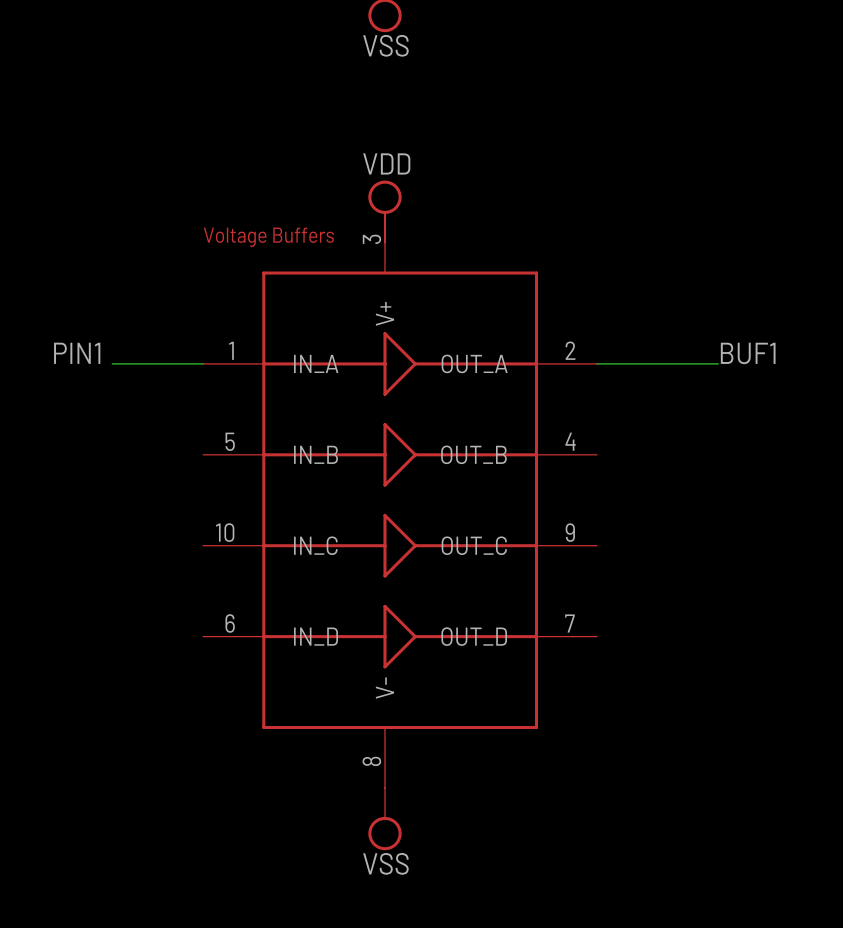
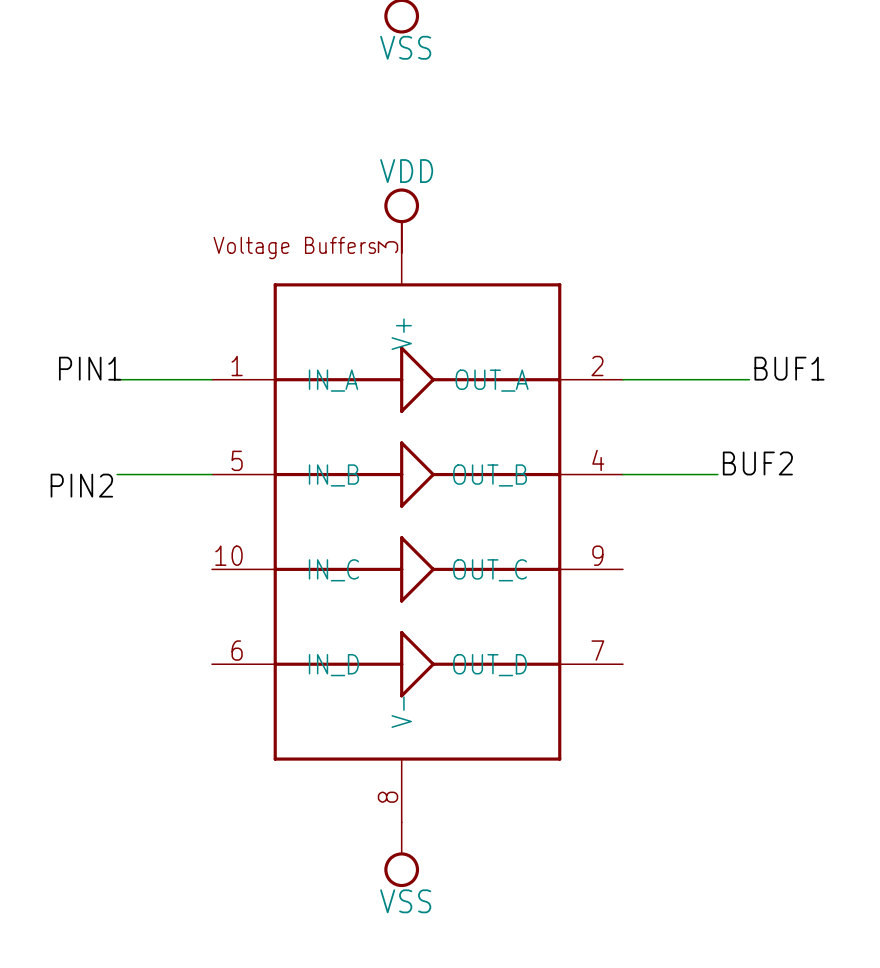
label: none -> BUF2 (757, 463)
wire: none -> (117, 474) (212, 474)
wire: none -> (622, 474) (717, 474)
label: none -> PIN2 (81, 485)

